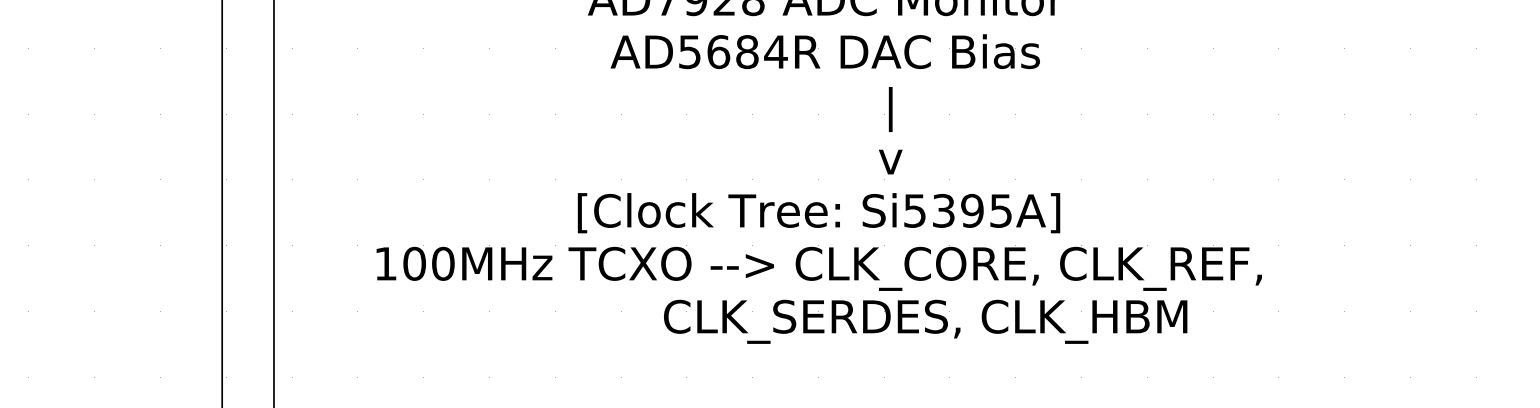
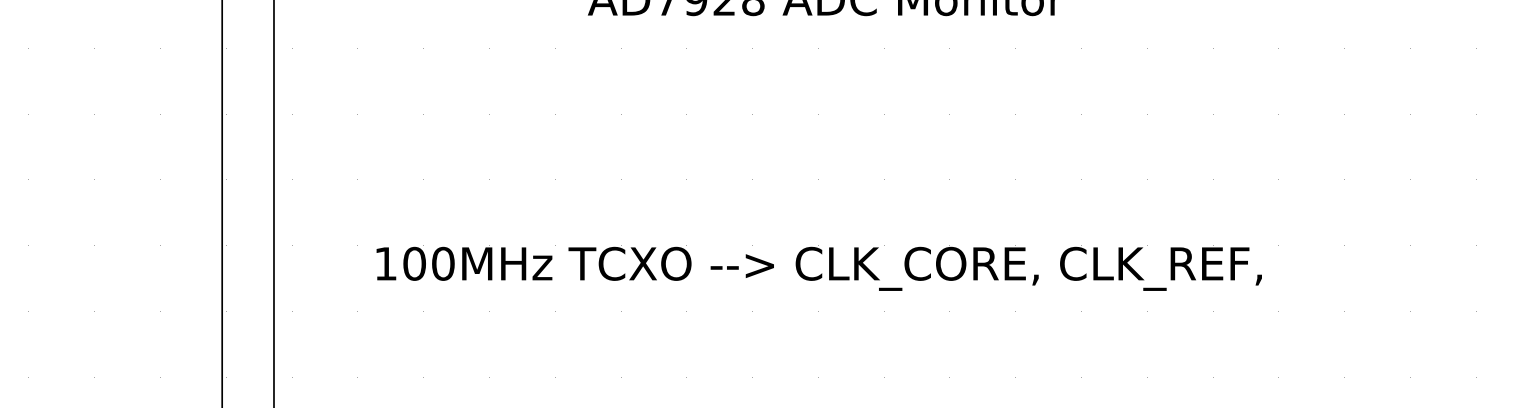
text: AD5684R DAC Bias (825, 51) -> none
text: | (890, 109) -> none
text: v (890, 162) -> none
text: [Clock Tree: Si5395A] (819, 213) -> none
text: CLK_SERDES, CLK_HBM (925, 321) -> none

